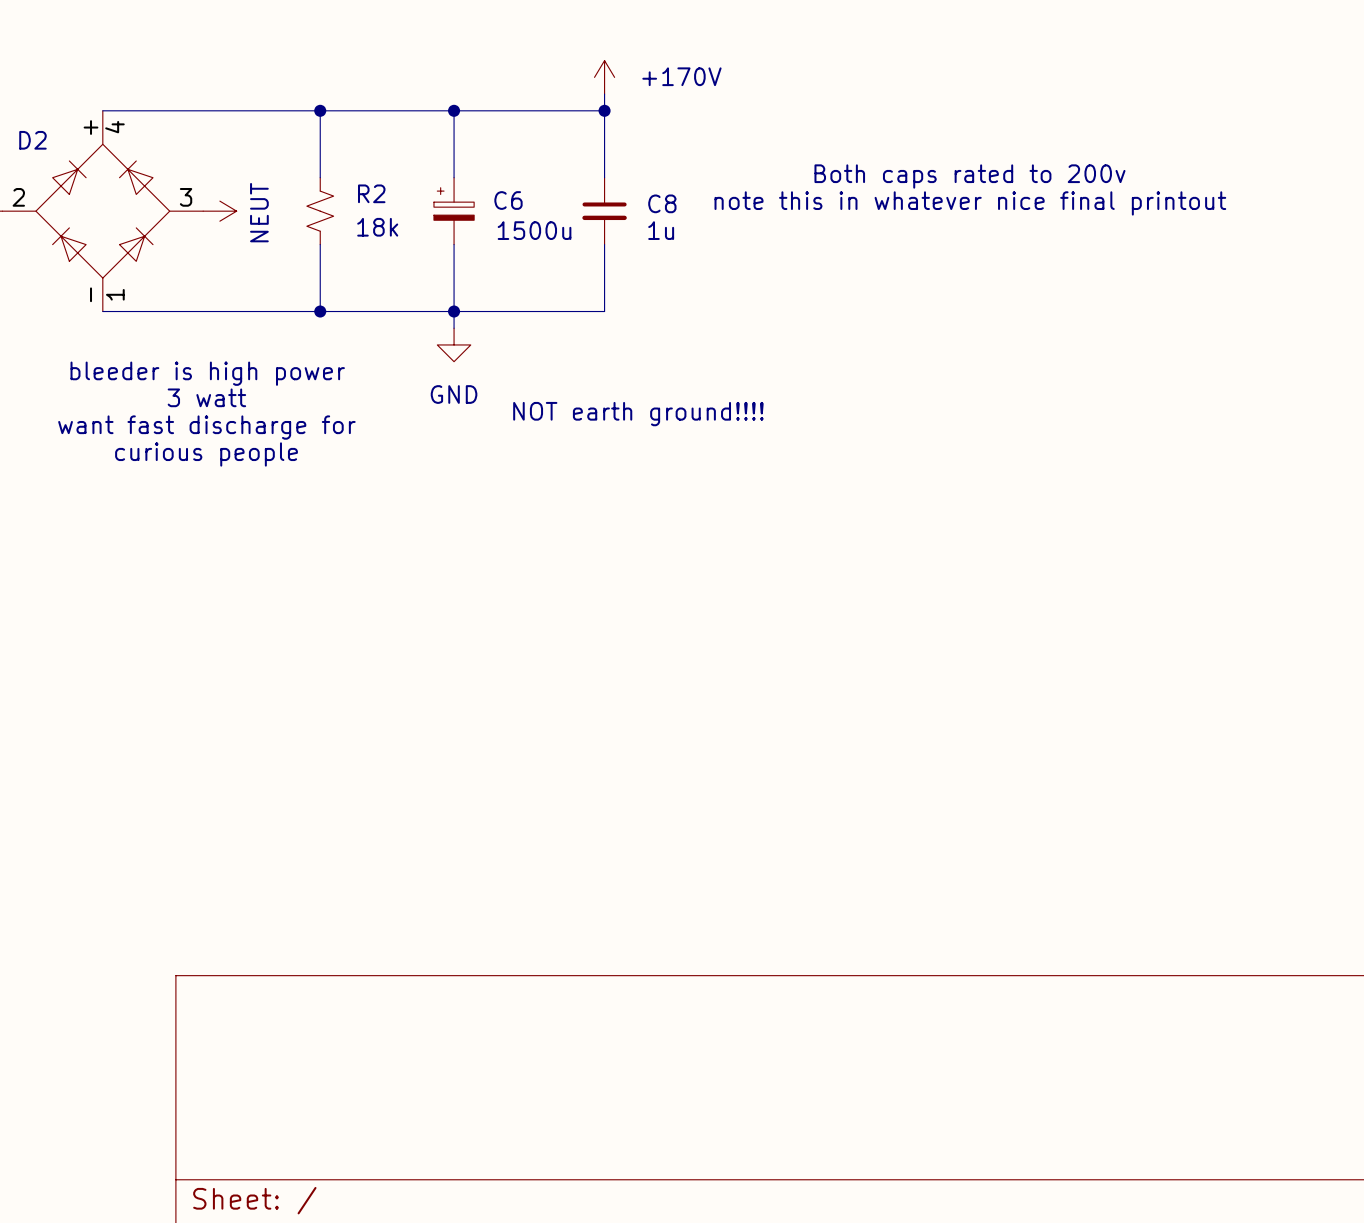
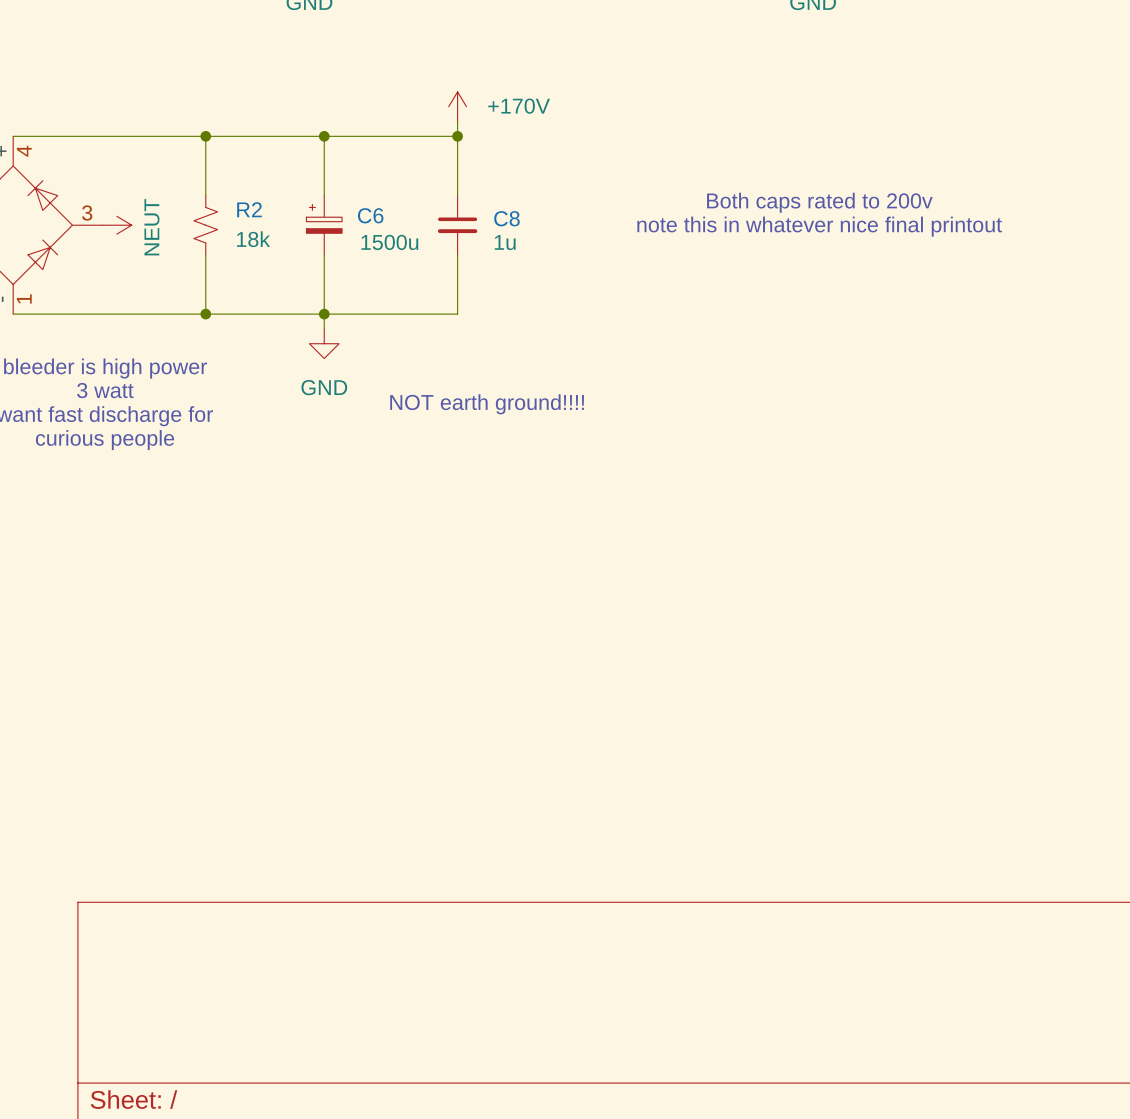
text position: Both caps rated to 200v (969, 176) -> Both caps rated to 200v (819, 202)
text position: note this in whatever nice final printout (970, 203) -> note this in whatever nice final printout (819, 226)

